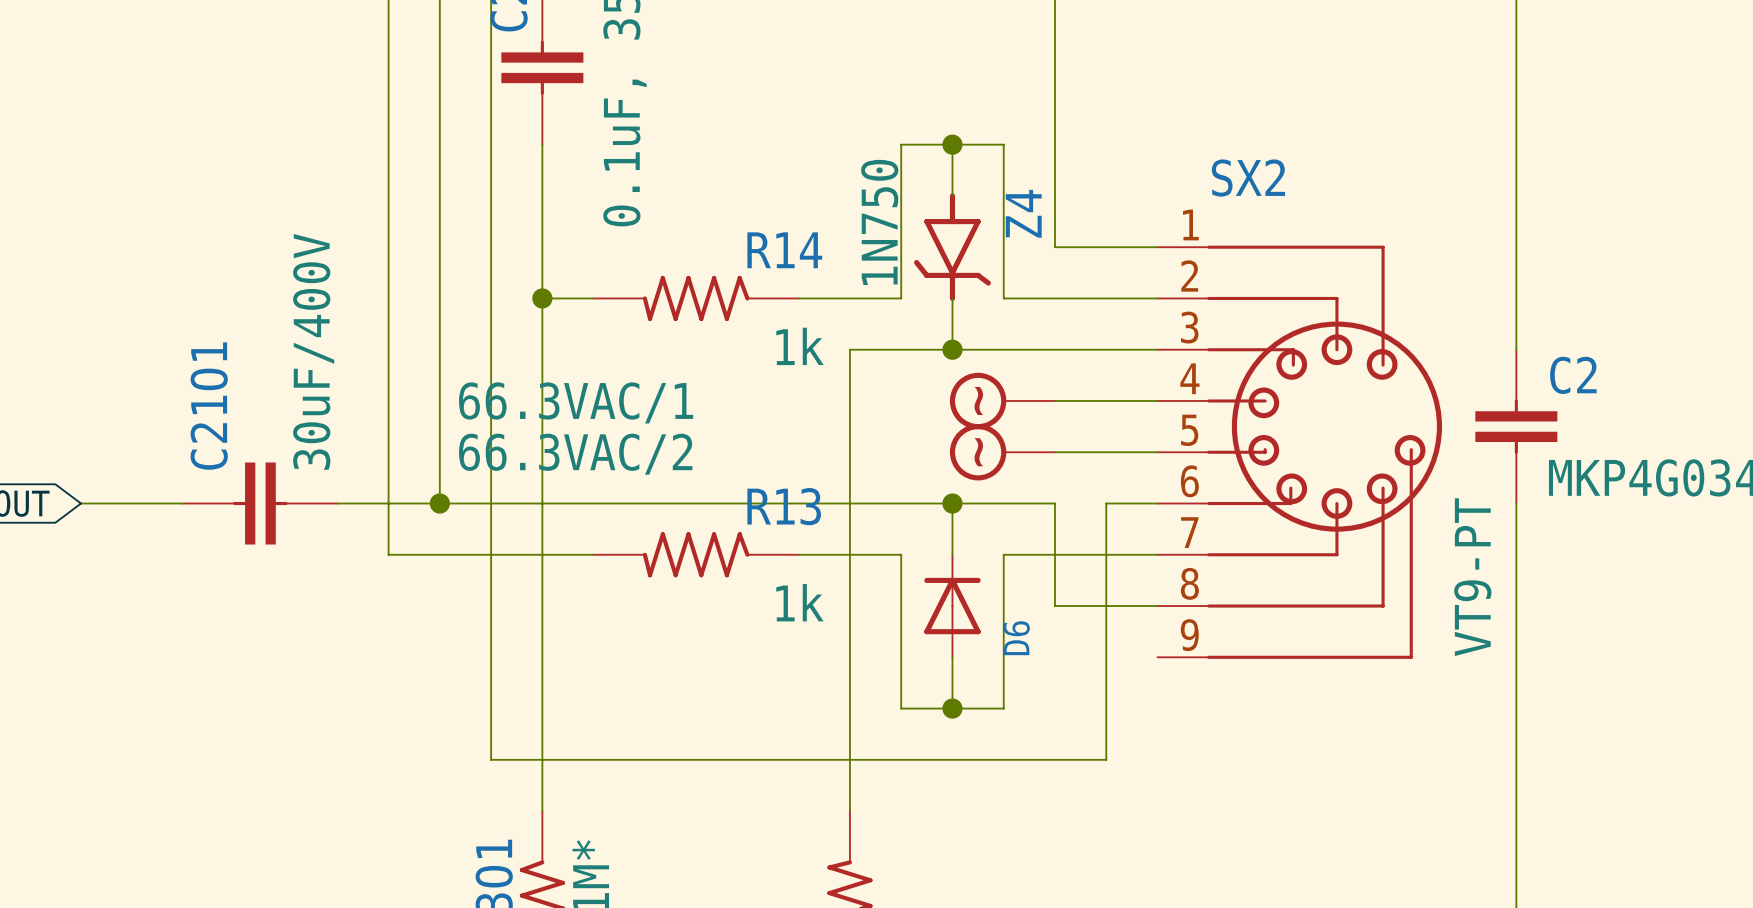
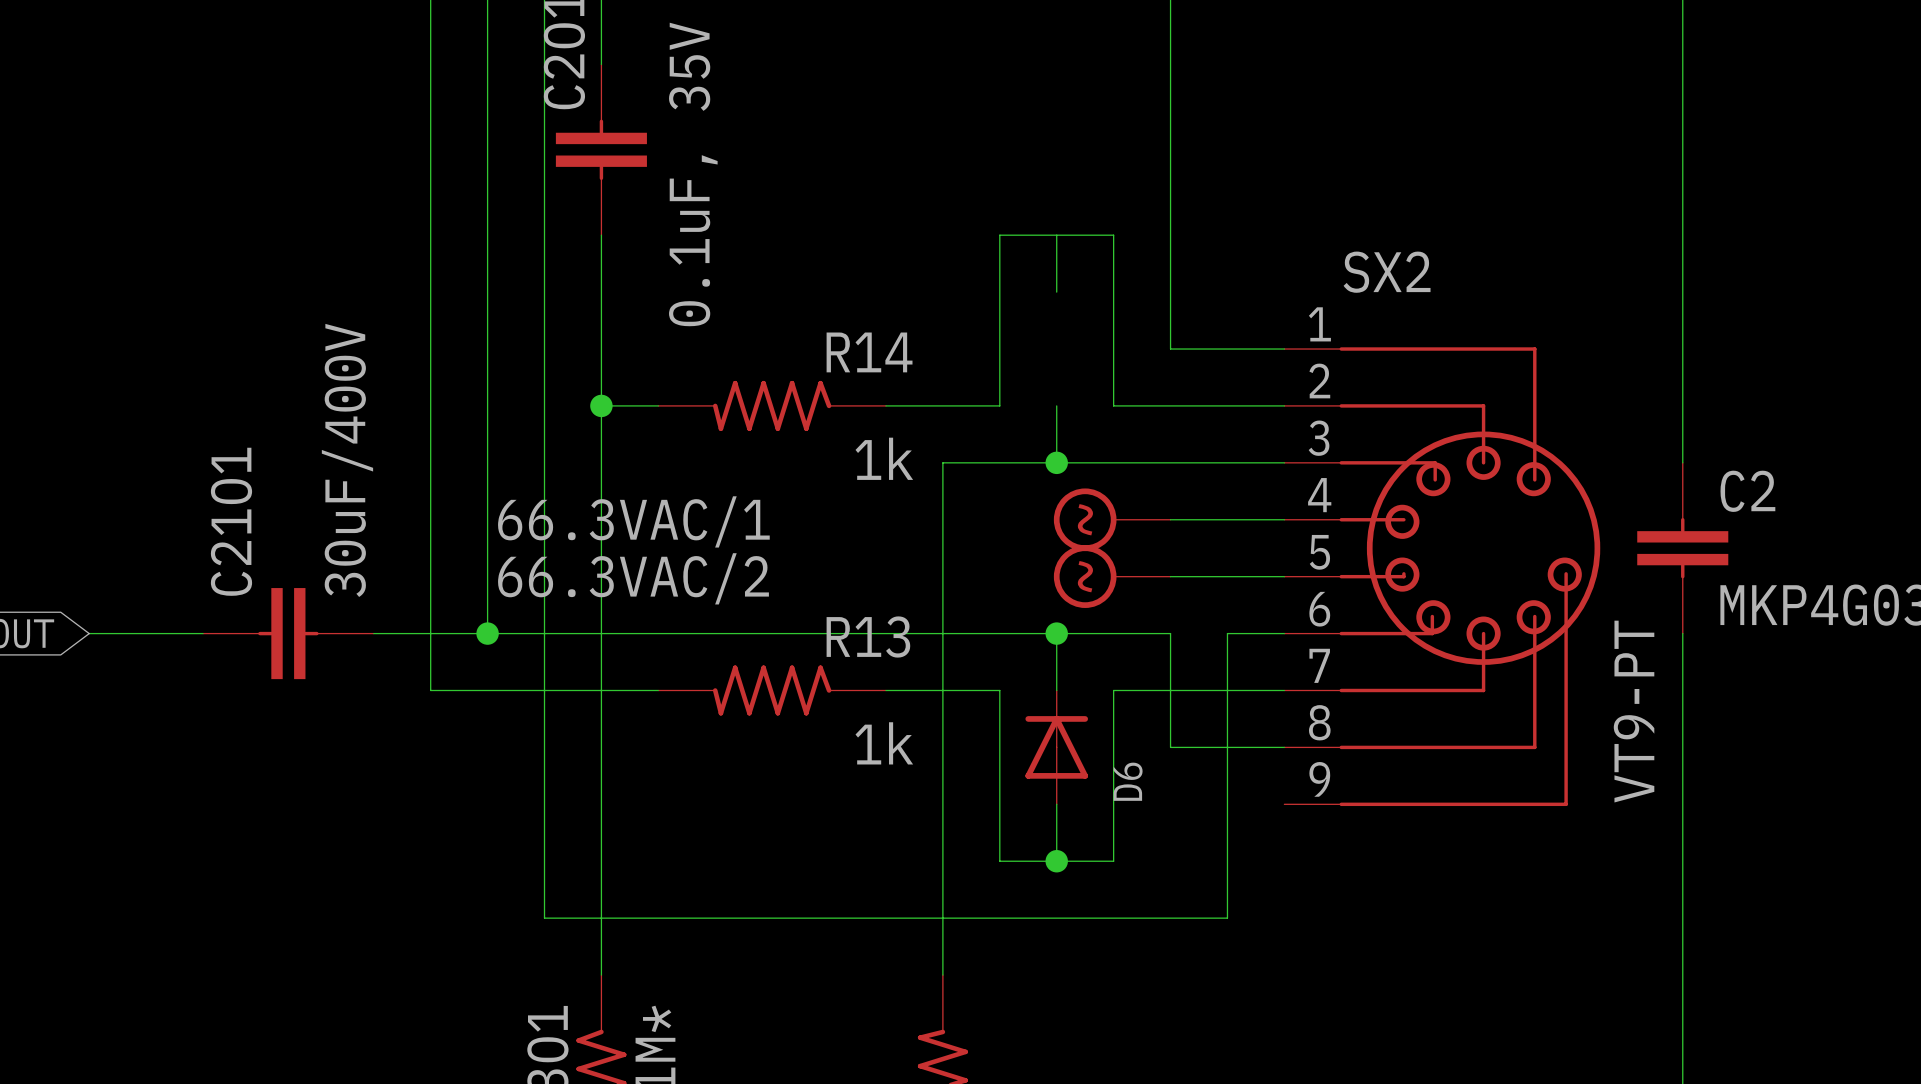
junction: (952, 144) -> none
Z4: 1N750 (952, 247) -> none

